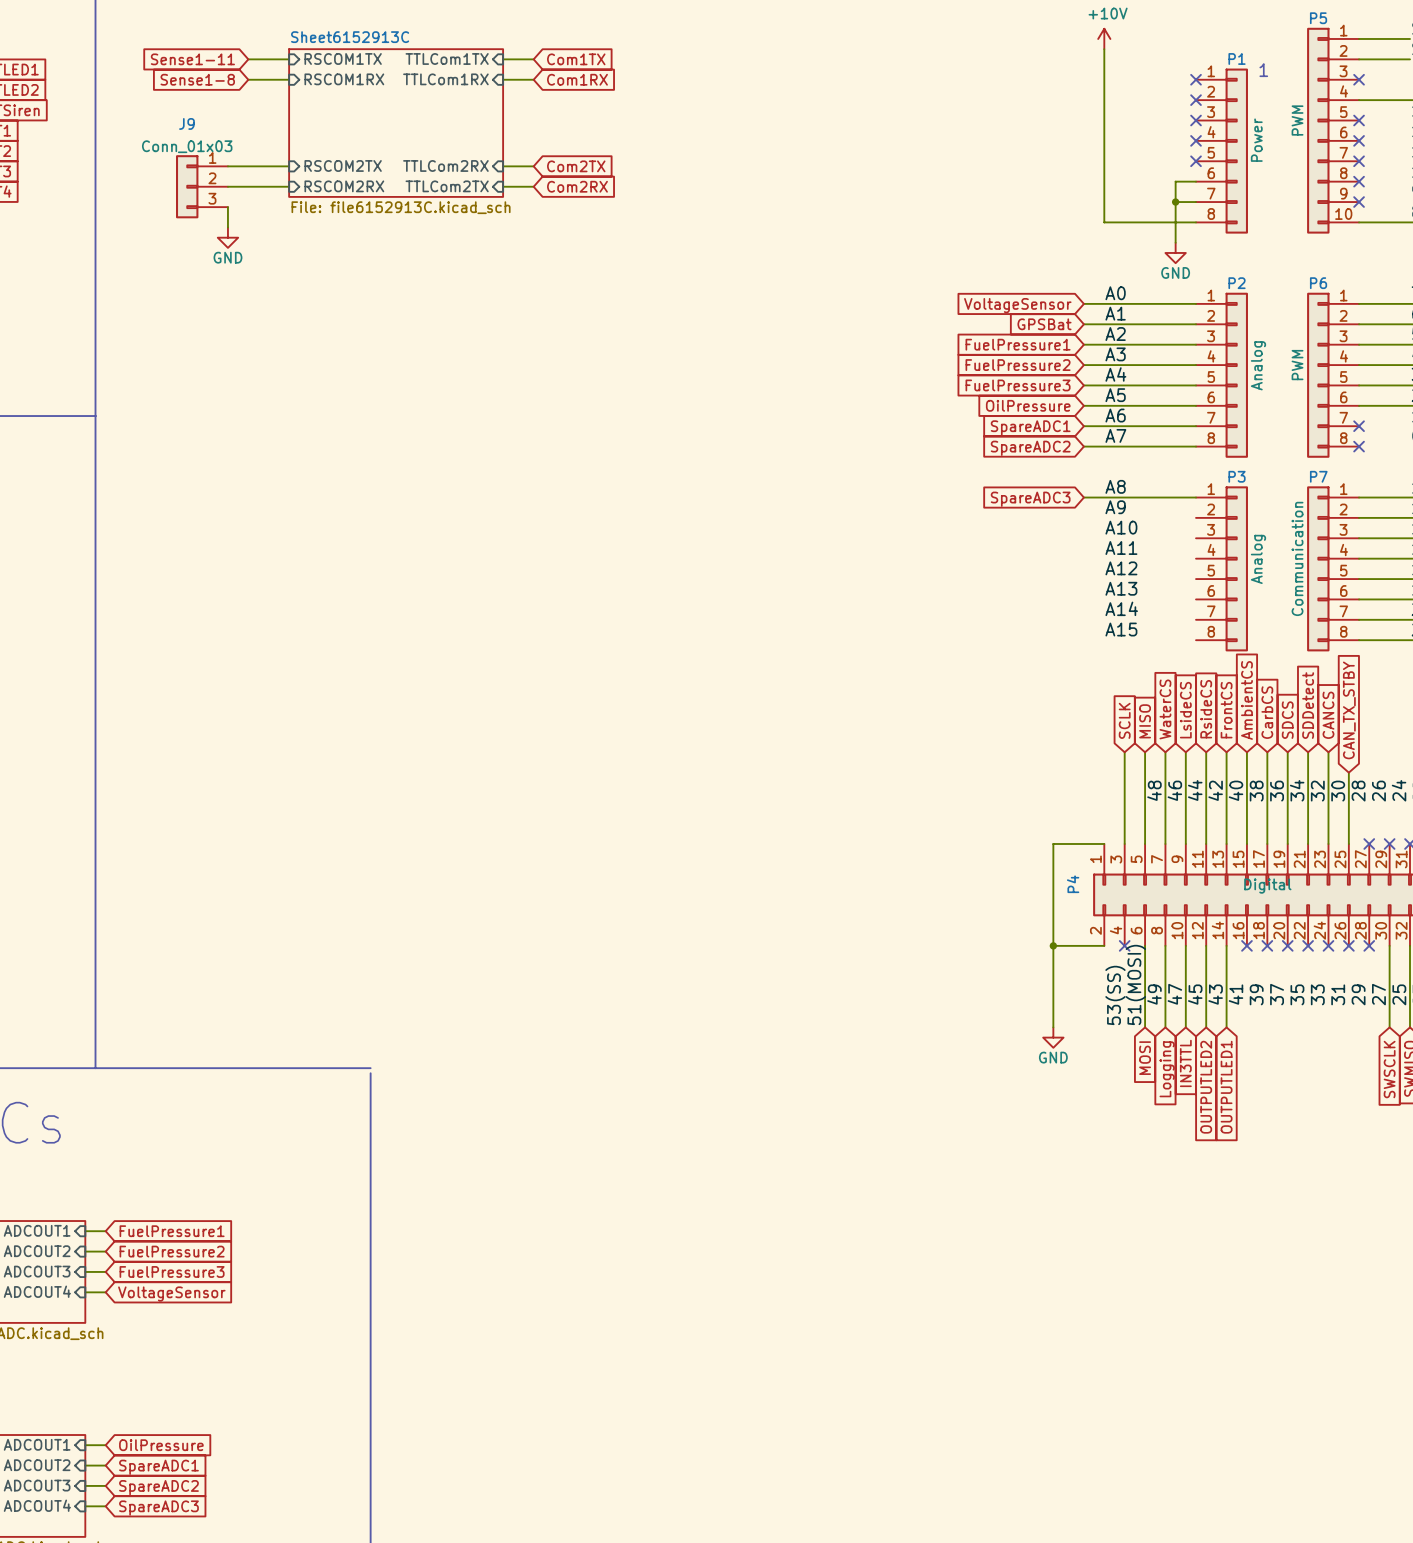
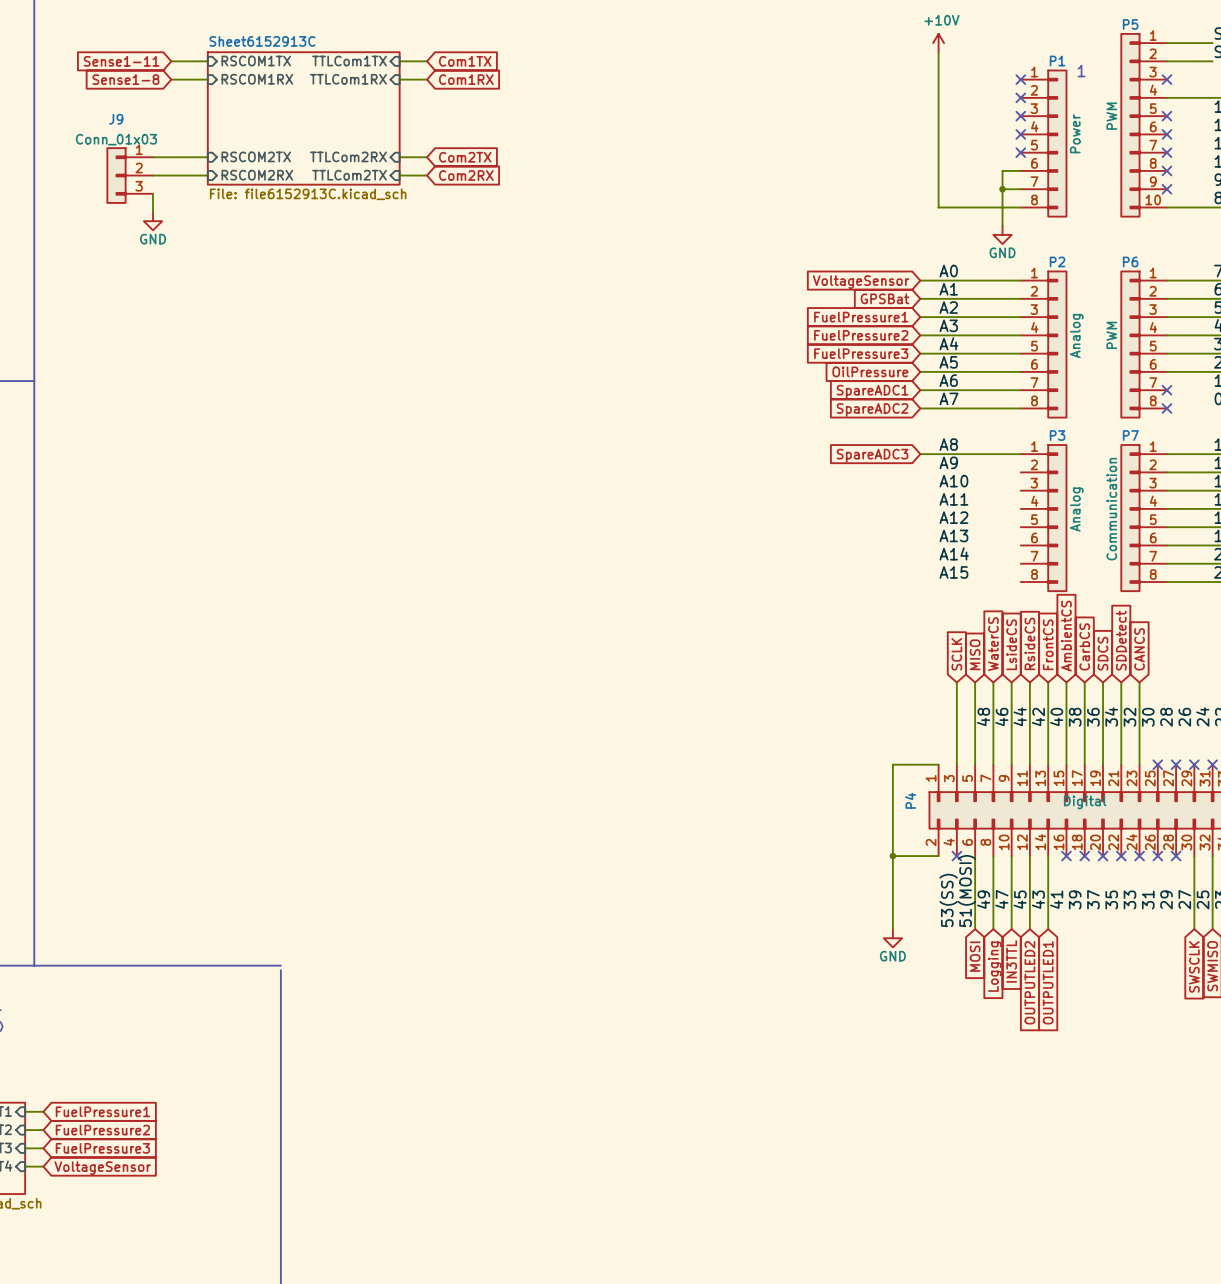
global label: CAN_TX_STBY (1349, 710) -> none
wire: (1348, 772) (1348, 843) -> none
no-connect mark: none -> (1157, 764)

